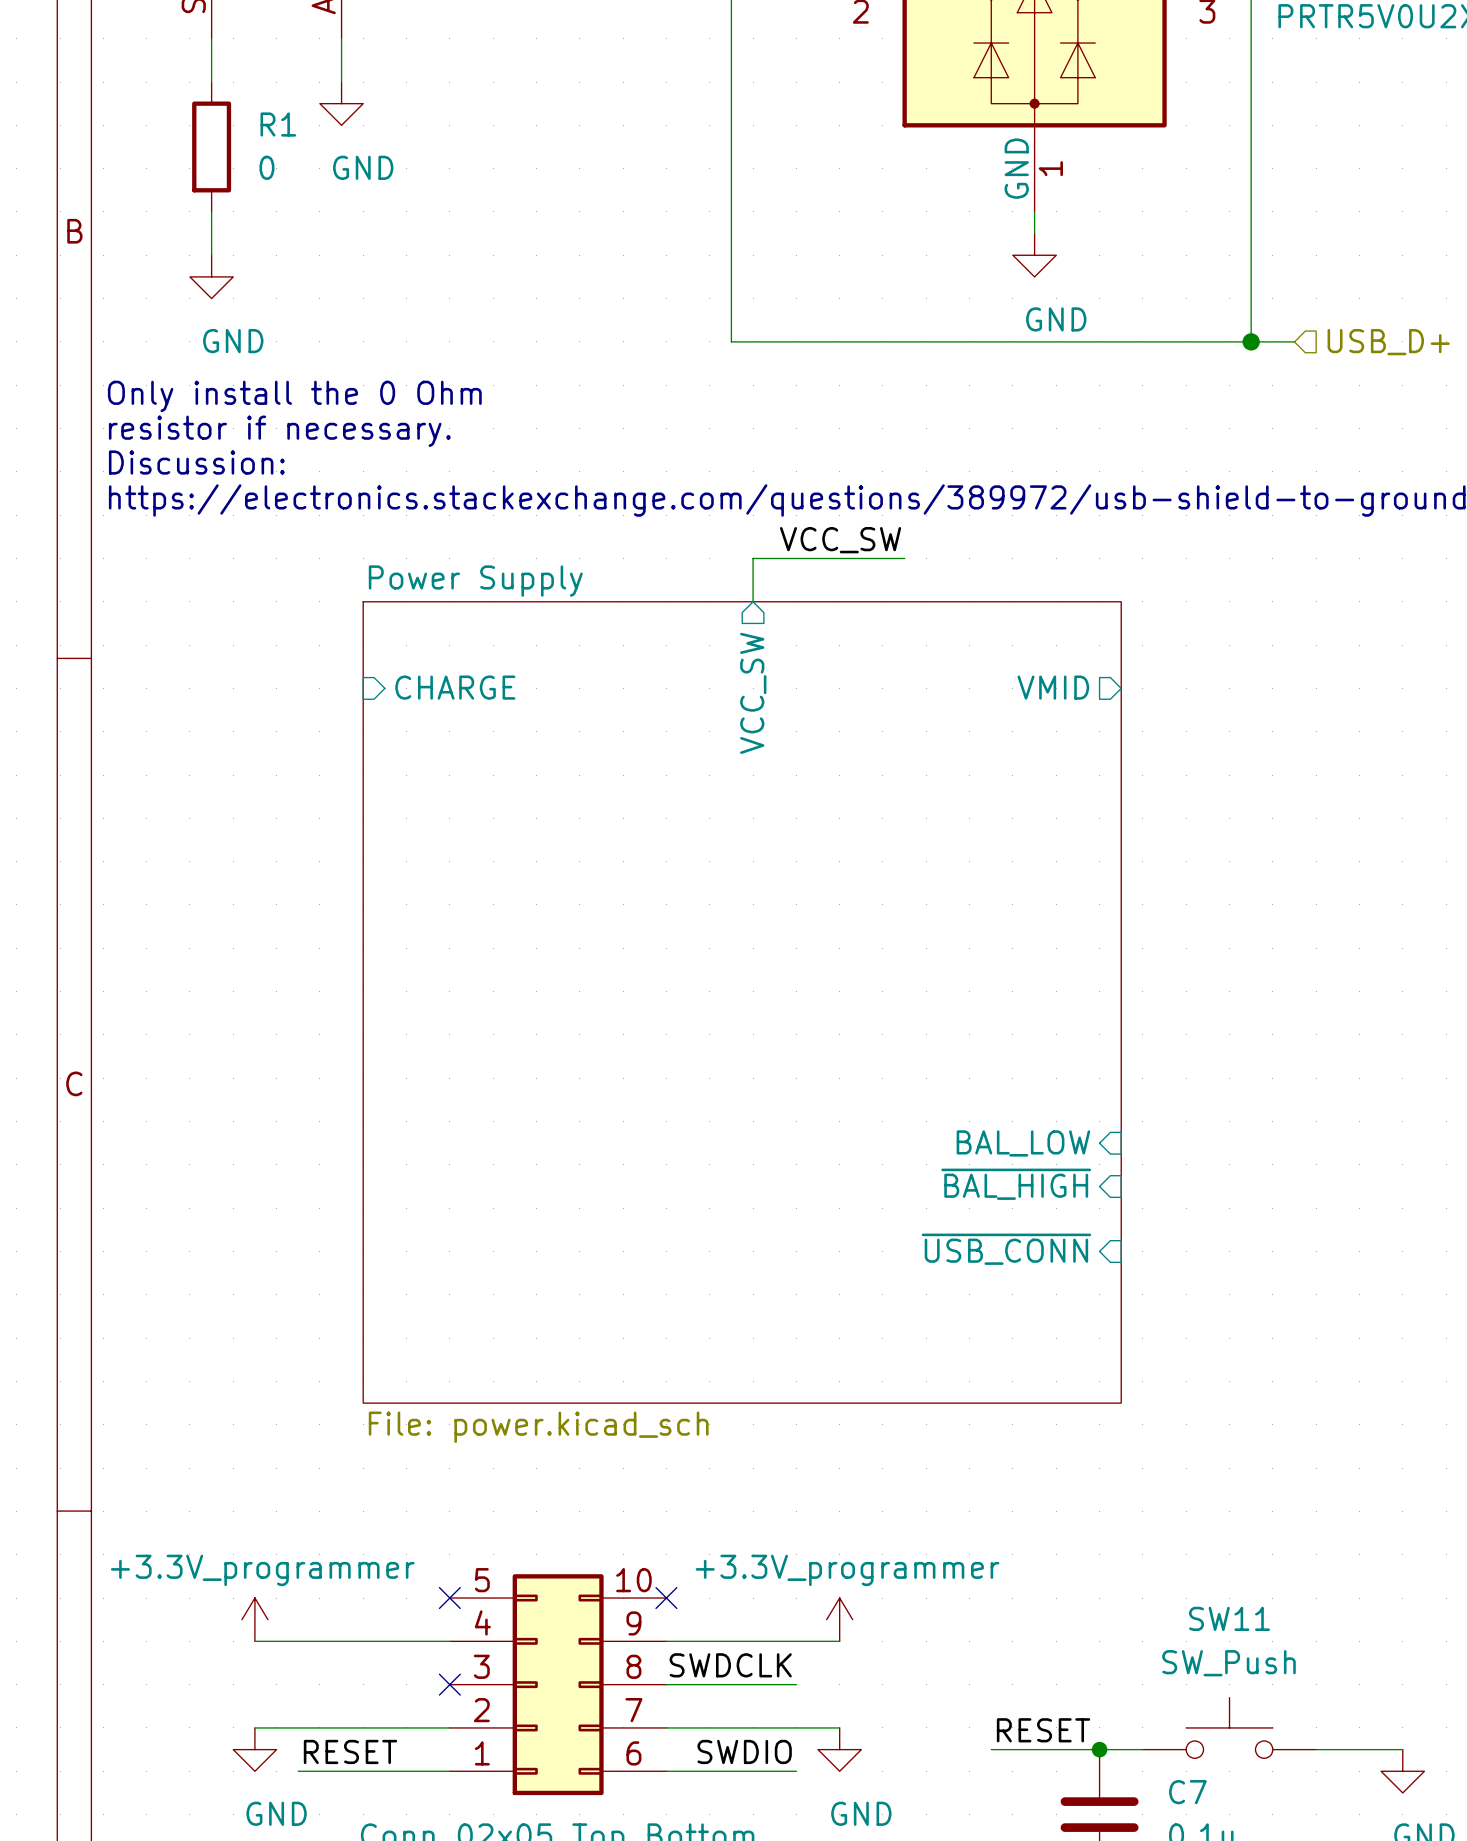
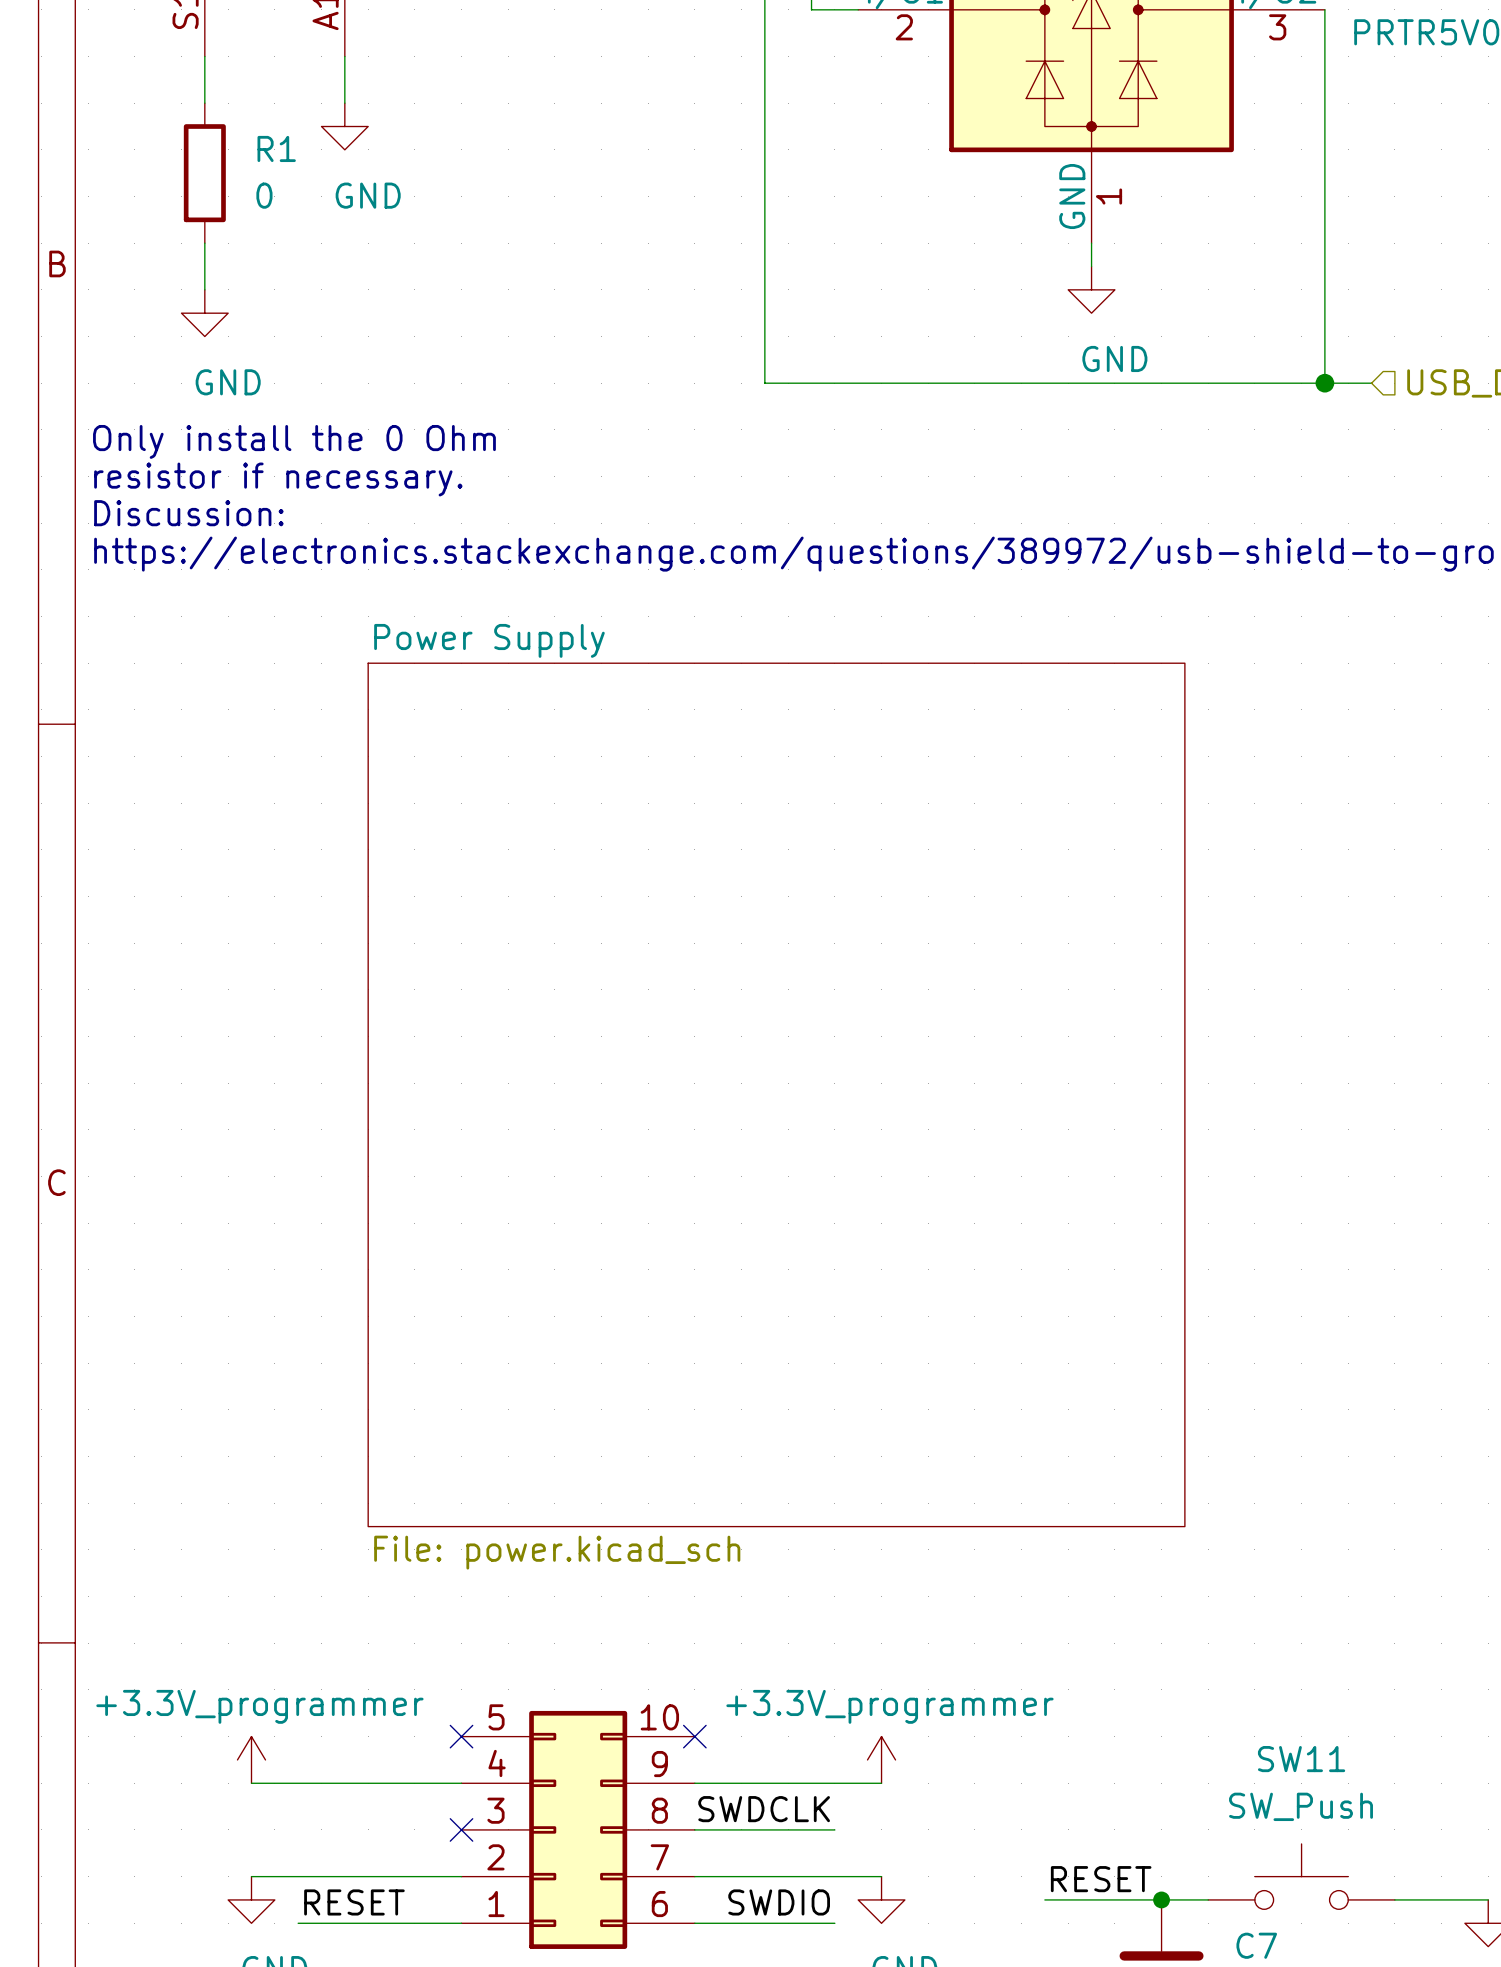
label: VCC_SW (840, 540) -> none
wire: (904, 558) (753, 558) (753, 601) -> none
sheet pin: CHARGE (455, 687) -> none
sheet pin: VMID (1053, 687) -> none
sheet pin: VCC_SW (753, 693) -> none
sheet pin: BAL_LOW (1023, 1143) -> none
sheet pin: ~{BAL_HIGH} (1016, 1184) -> none
sheet pin: ~{USB_CONN} (1006, 1249) -> none

